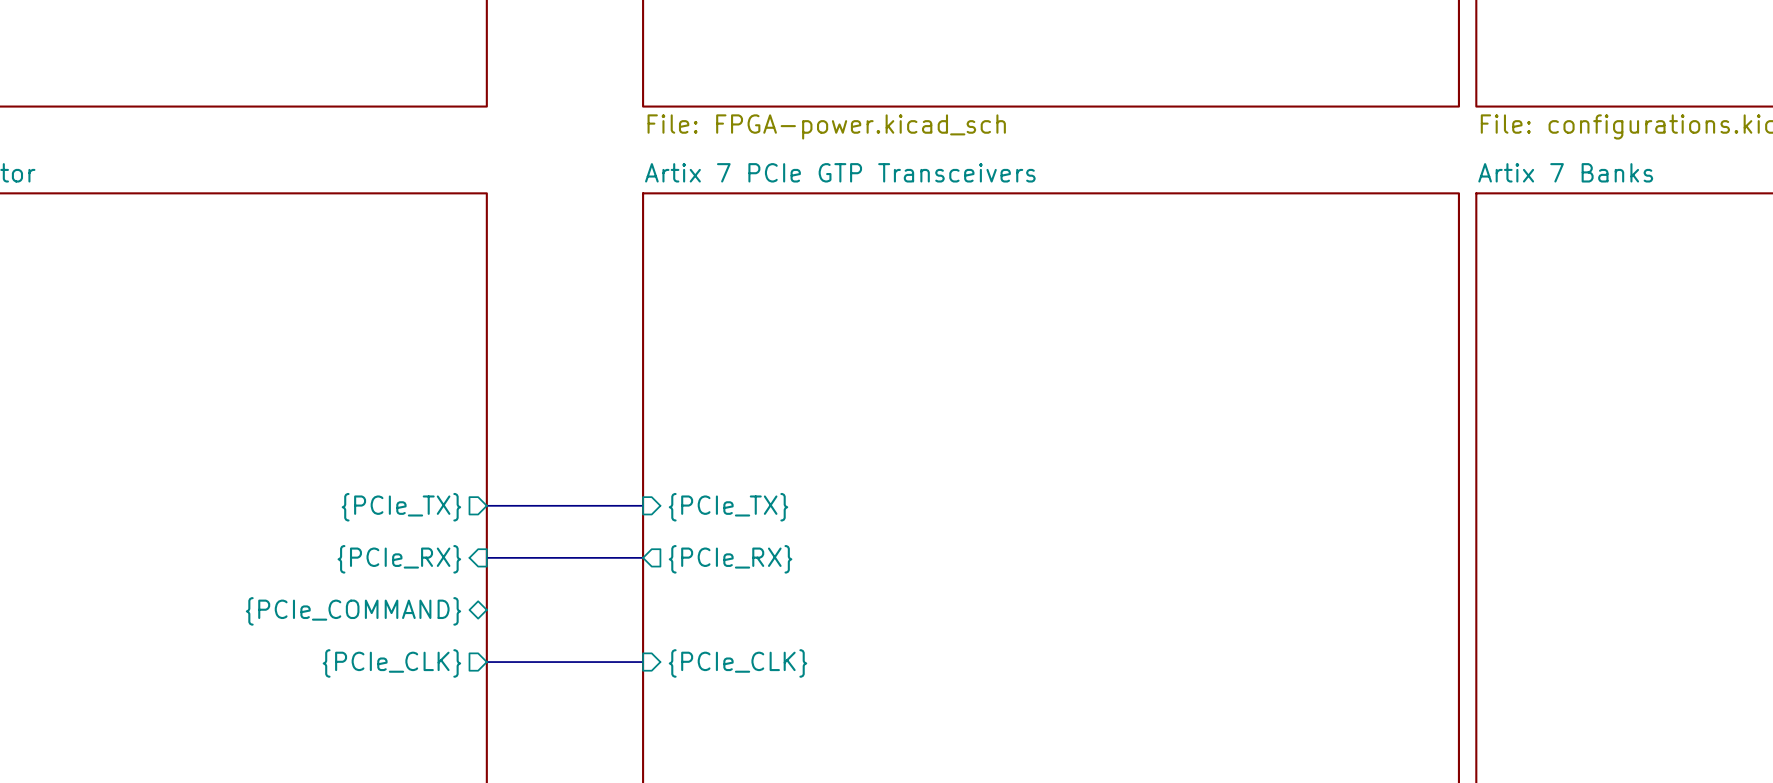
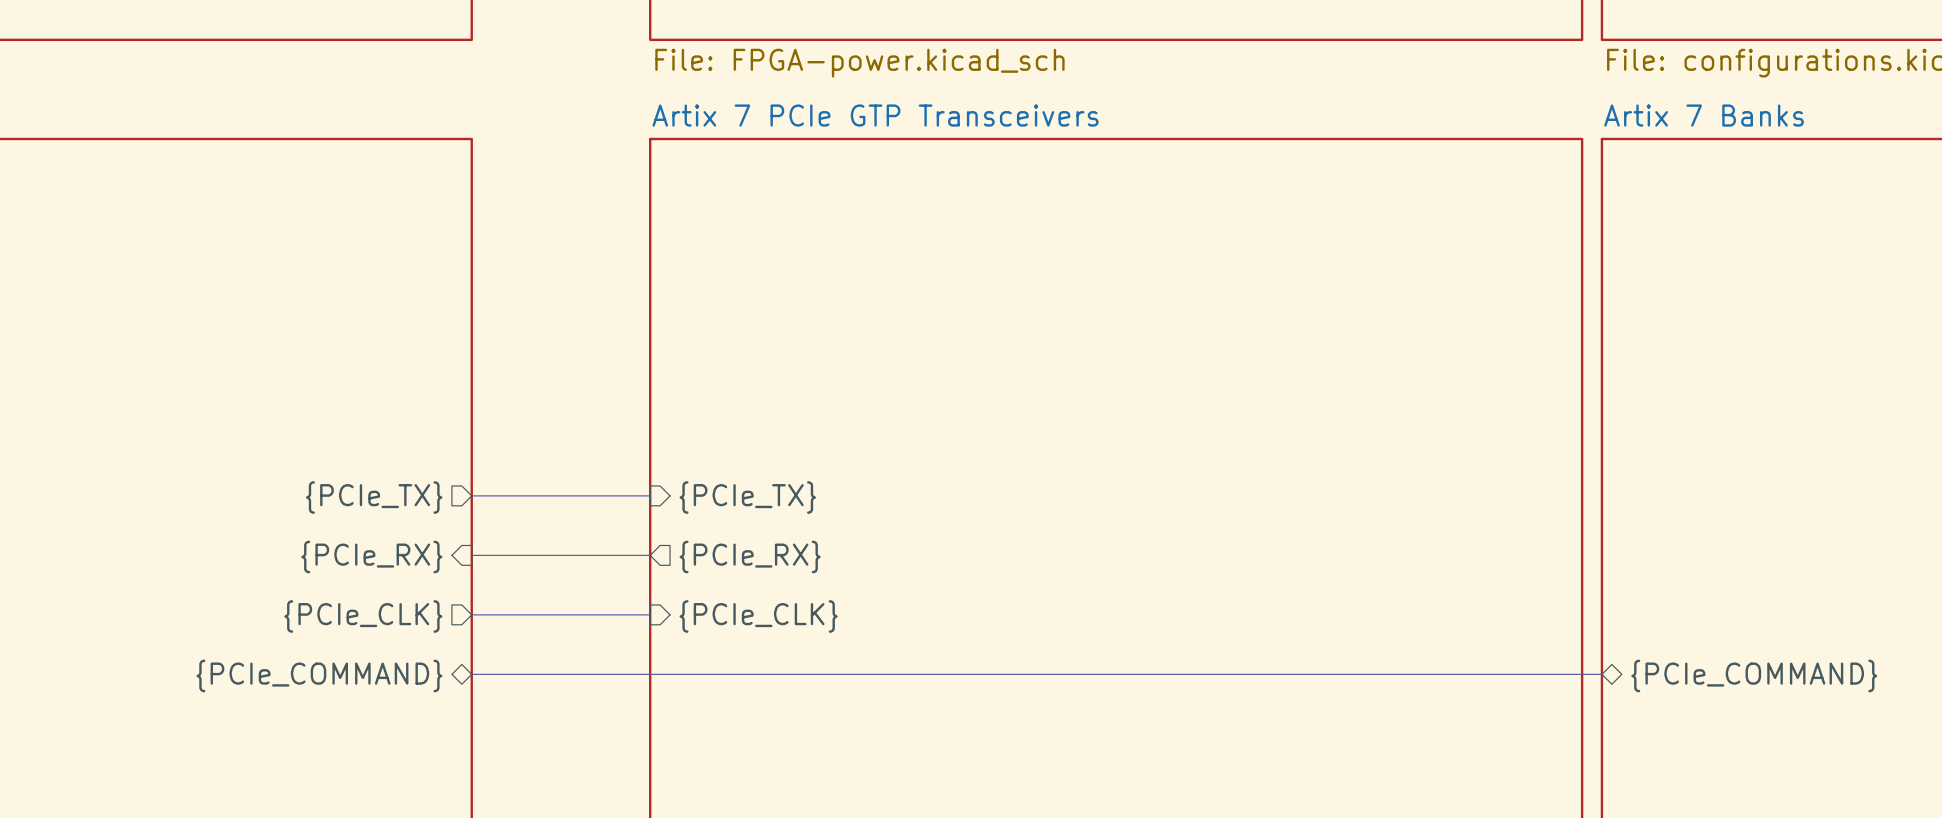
bus: none -> (471, 614) (650, 614)
sheet pin shape: bidirectional (353, 611) -> output (363, 616)
sheet pin: {PCIe_COMMAND} (353, 611) -> {PCIe_CLK} (363, 616)
bus: none -> (650, 674) (1601, 674)
sheet pin shape: output (391, 663) -> bidirectional (319, 675)
sheet pin: {PCIe_CLK} (391, 663) -> {PCIe_COMMAND} (319, 675)
sheet pin position: {PCIe_CLK} (737, 663) -> {PCIe_CLK} (758, 616)
sheet pin: none -> {PCIe_COMMAND} (1754, 675)

